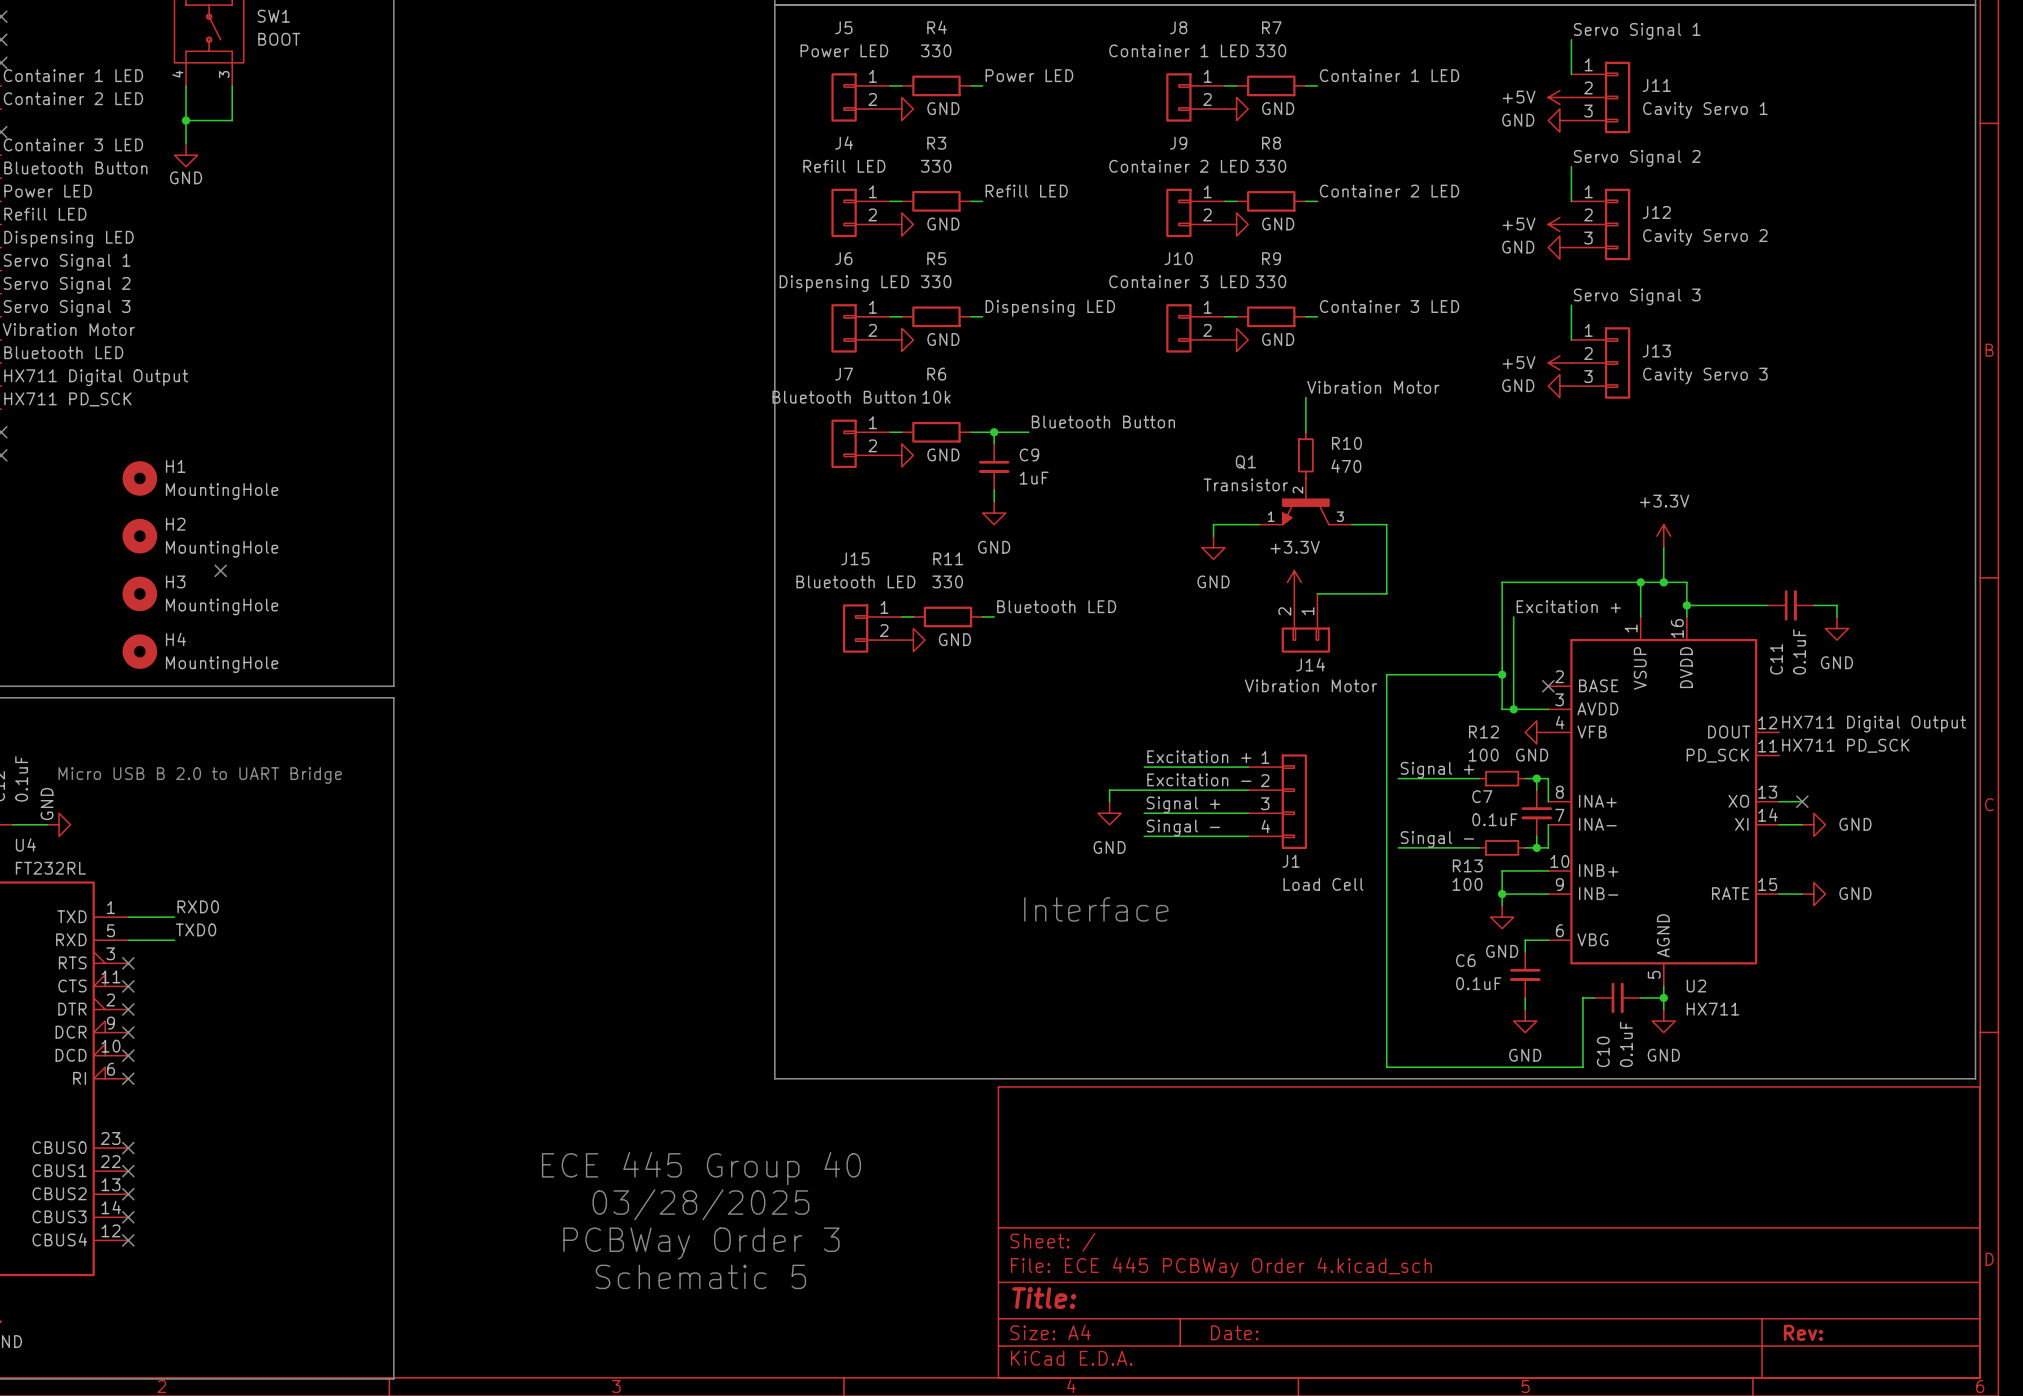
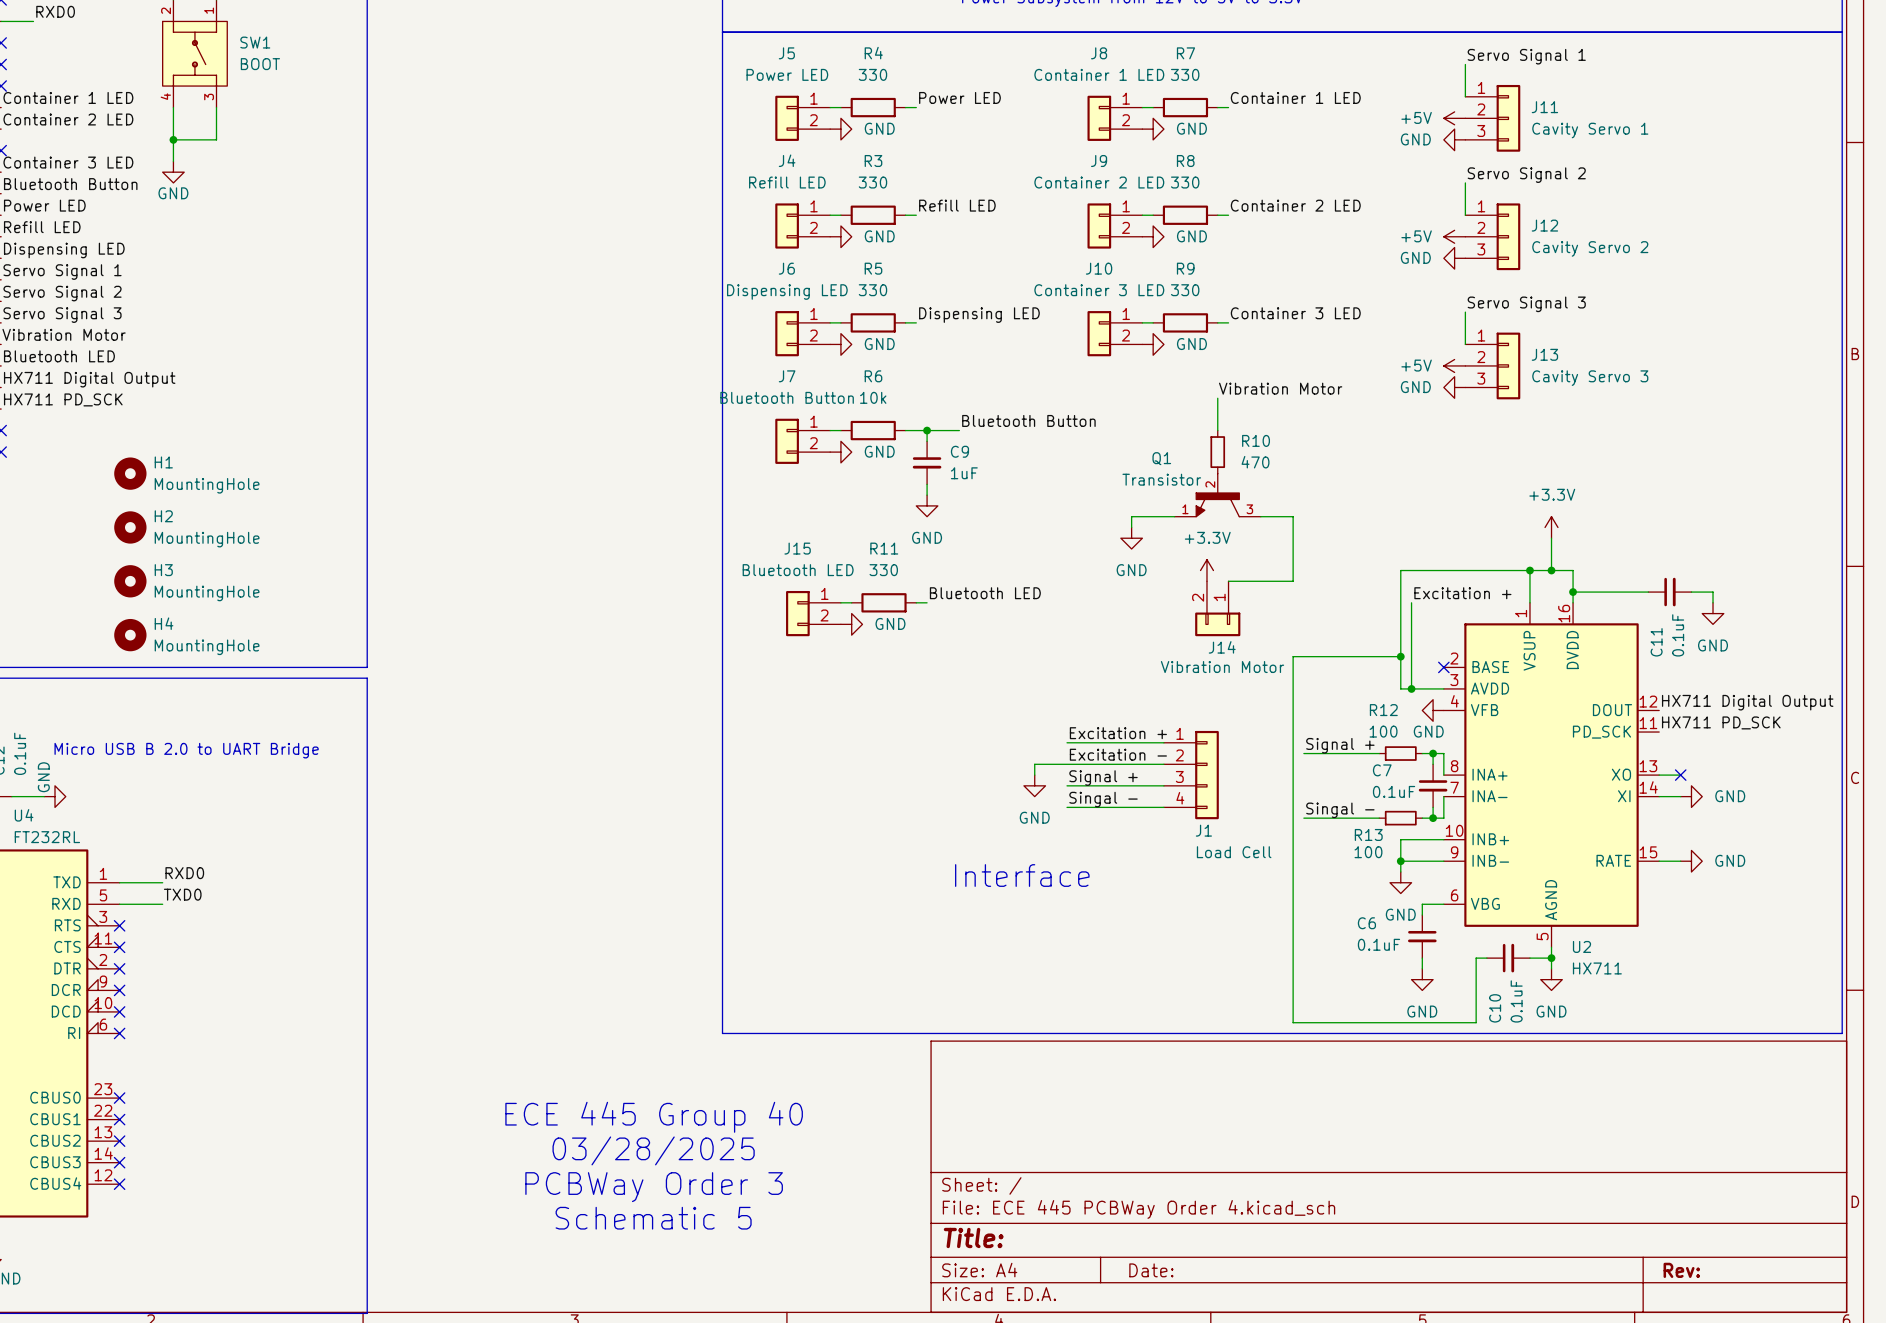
no-connect mark: (220, 570) -> none

